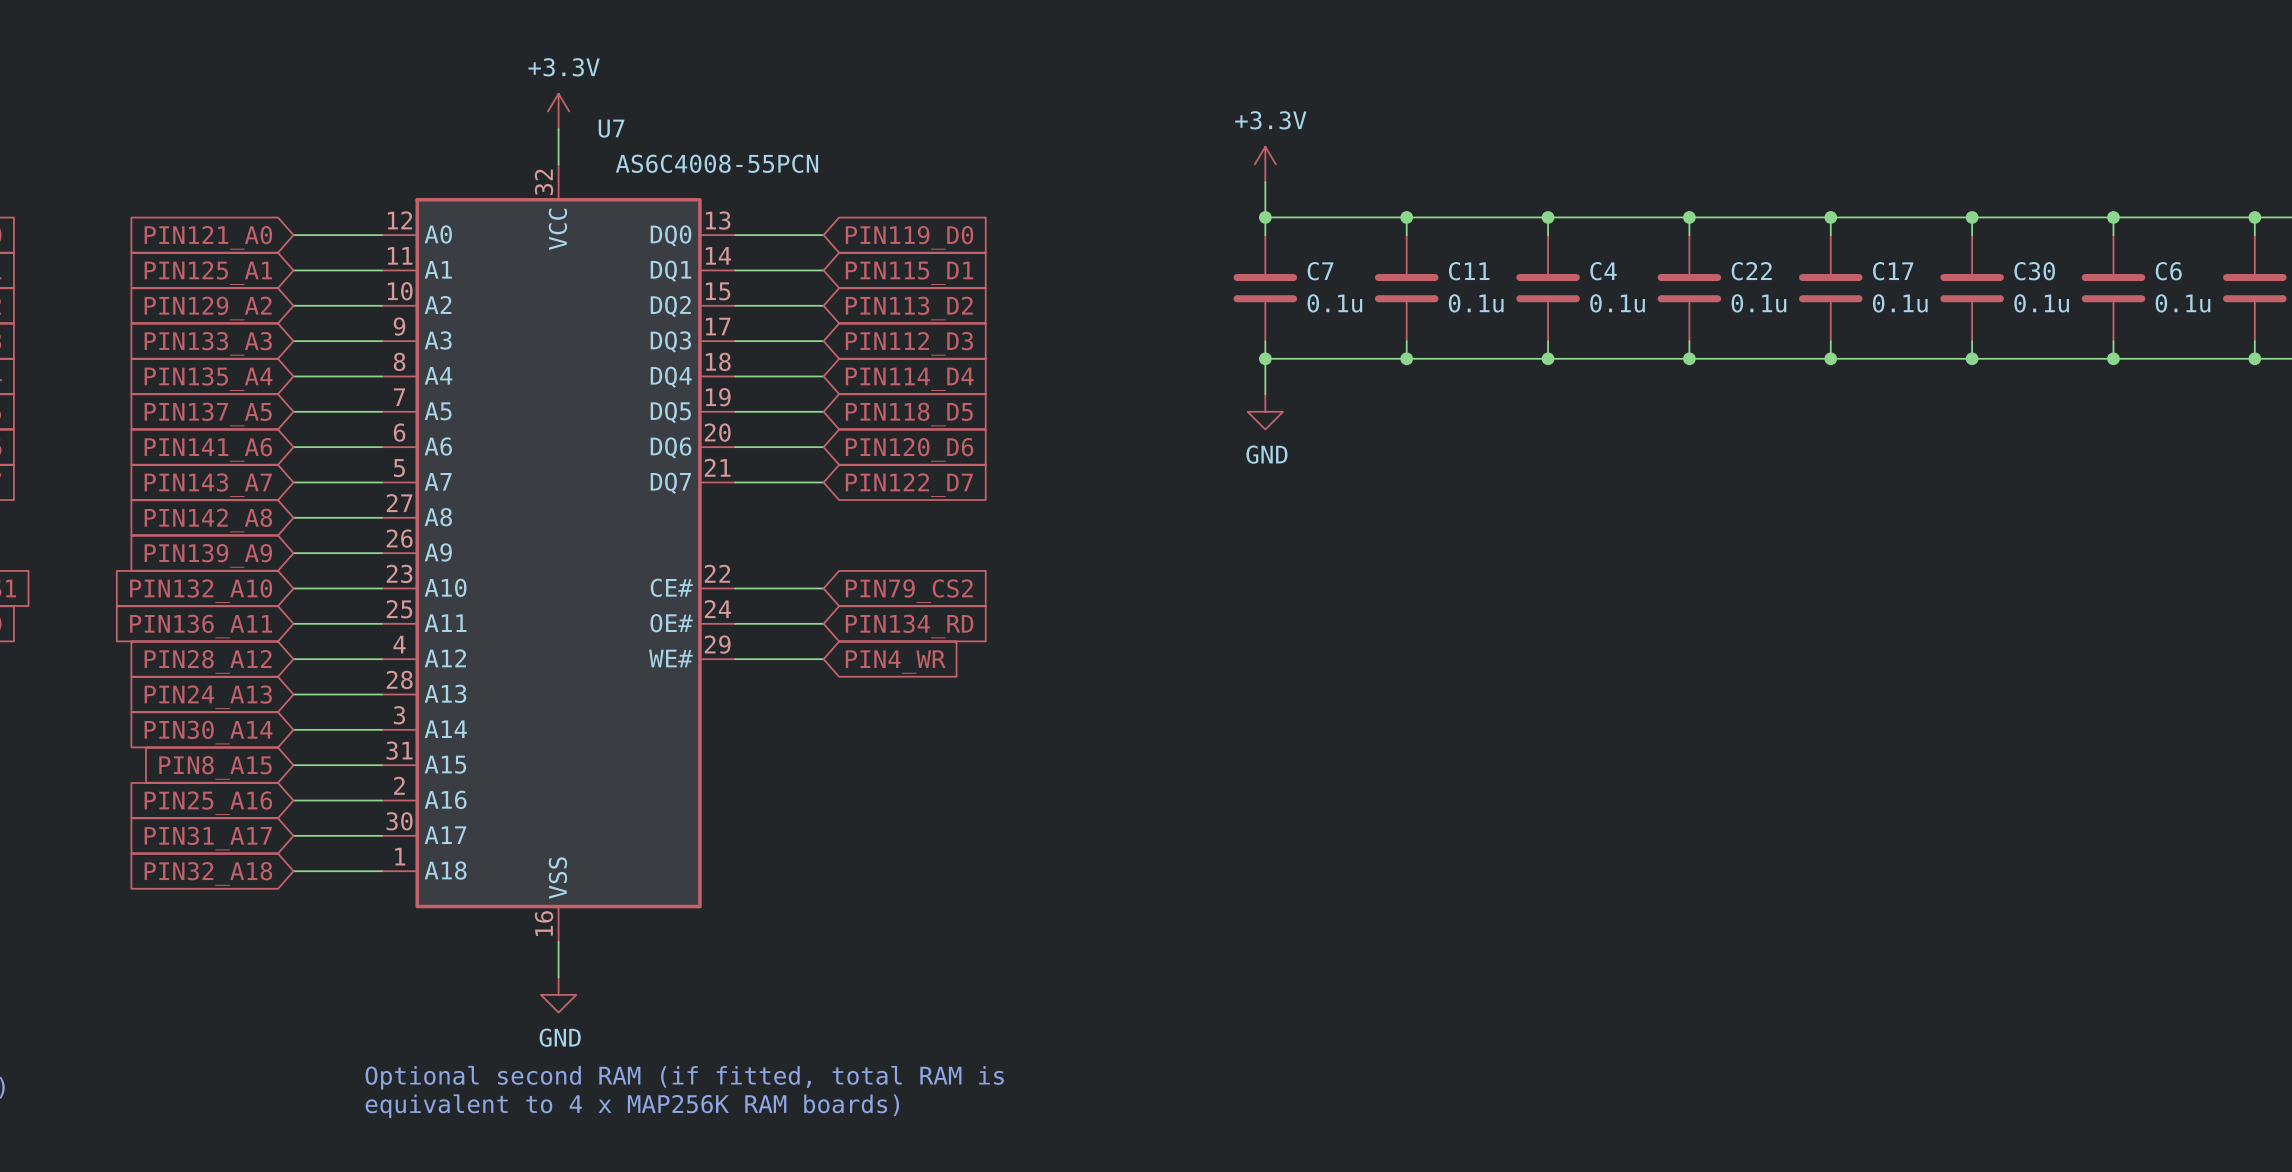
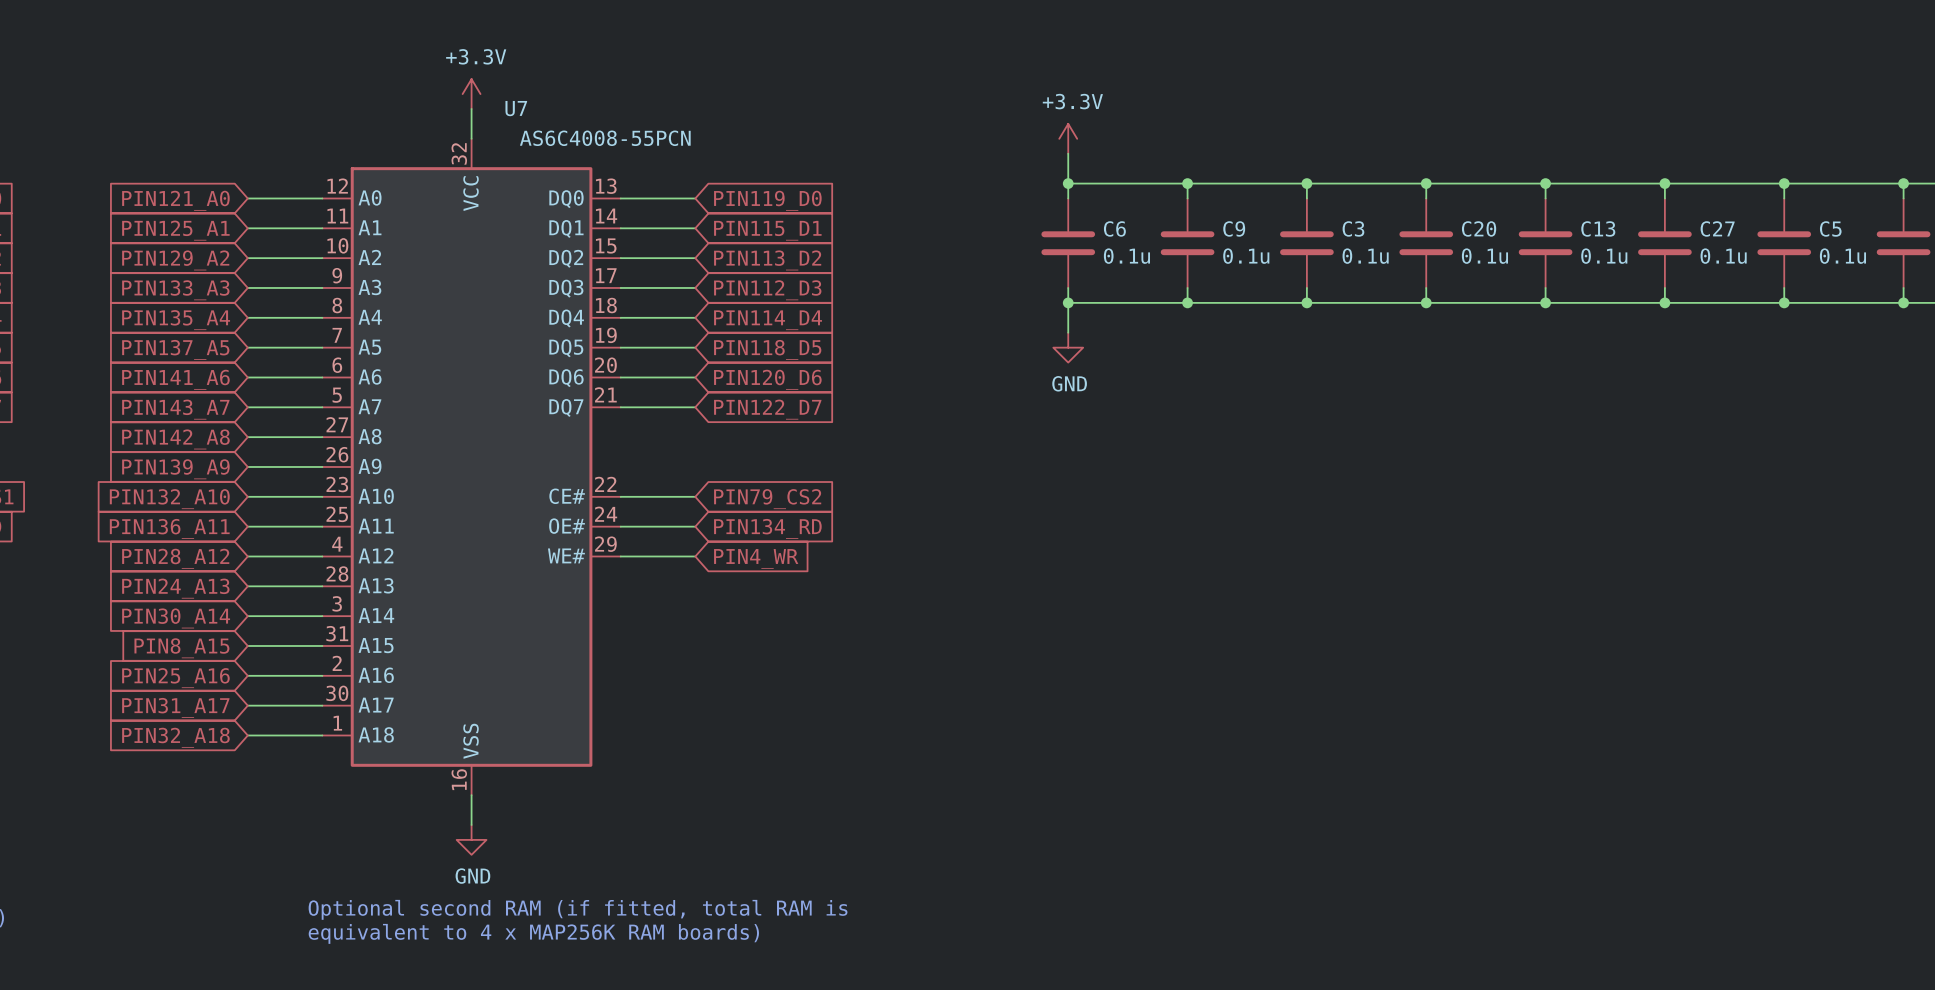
C7 name: C7 (1320, 271) -> C6 (1114, 228)
C11 name: C11 (1469, 271) -> C9 (1234, 228)
C4 name: C4 (1603, 271) -> C3 (1353, 228)
C22 name: C22 (1751, 271) -> C20 (1479, 228)
C17 name: C17 (1893, 271) -> C13 (1598, 228)
C30 name: C30 (2034, 271) -> C27 (1717, 228)
C6 name: C6 (2168, 271) -> C5 (1830, 228)

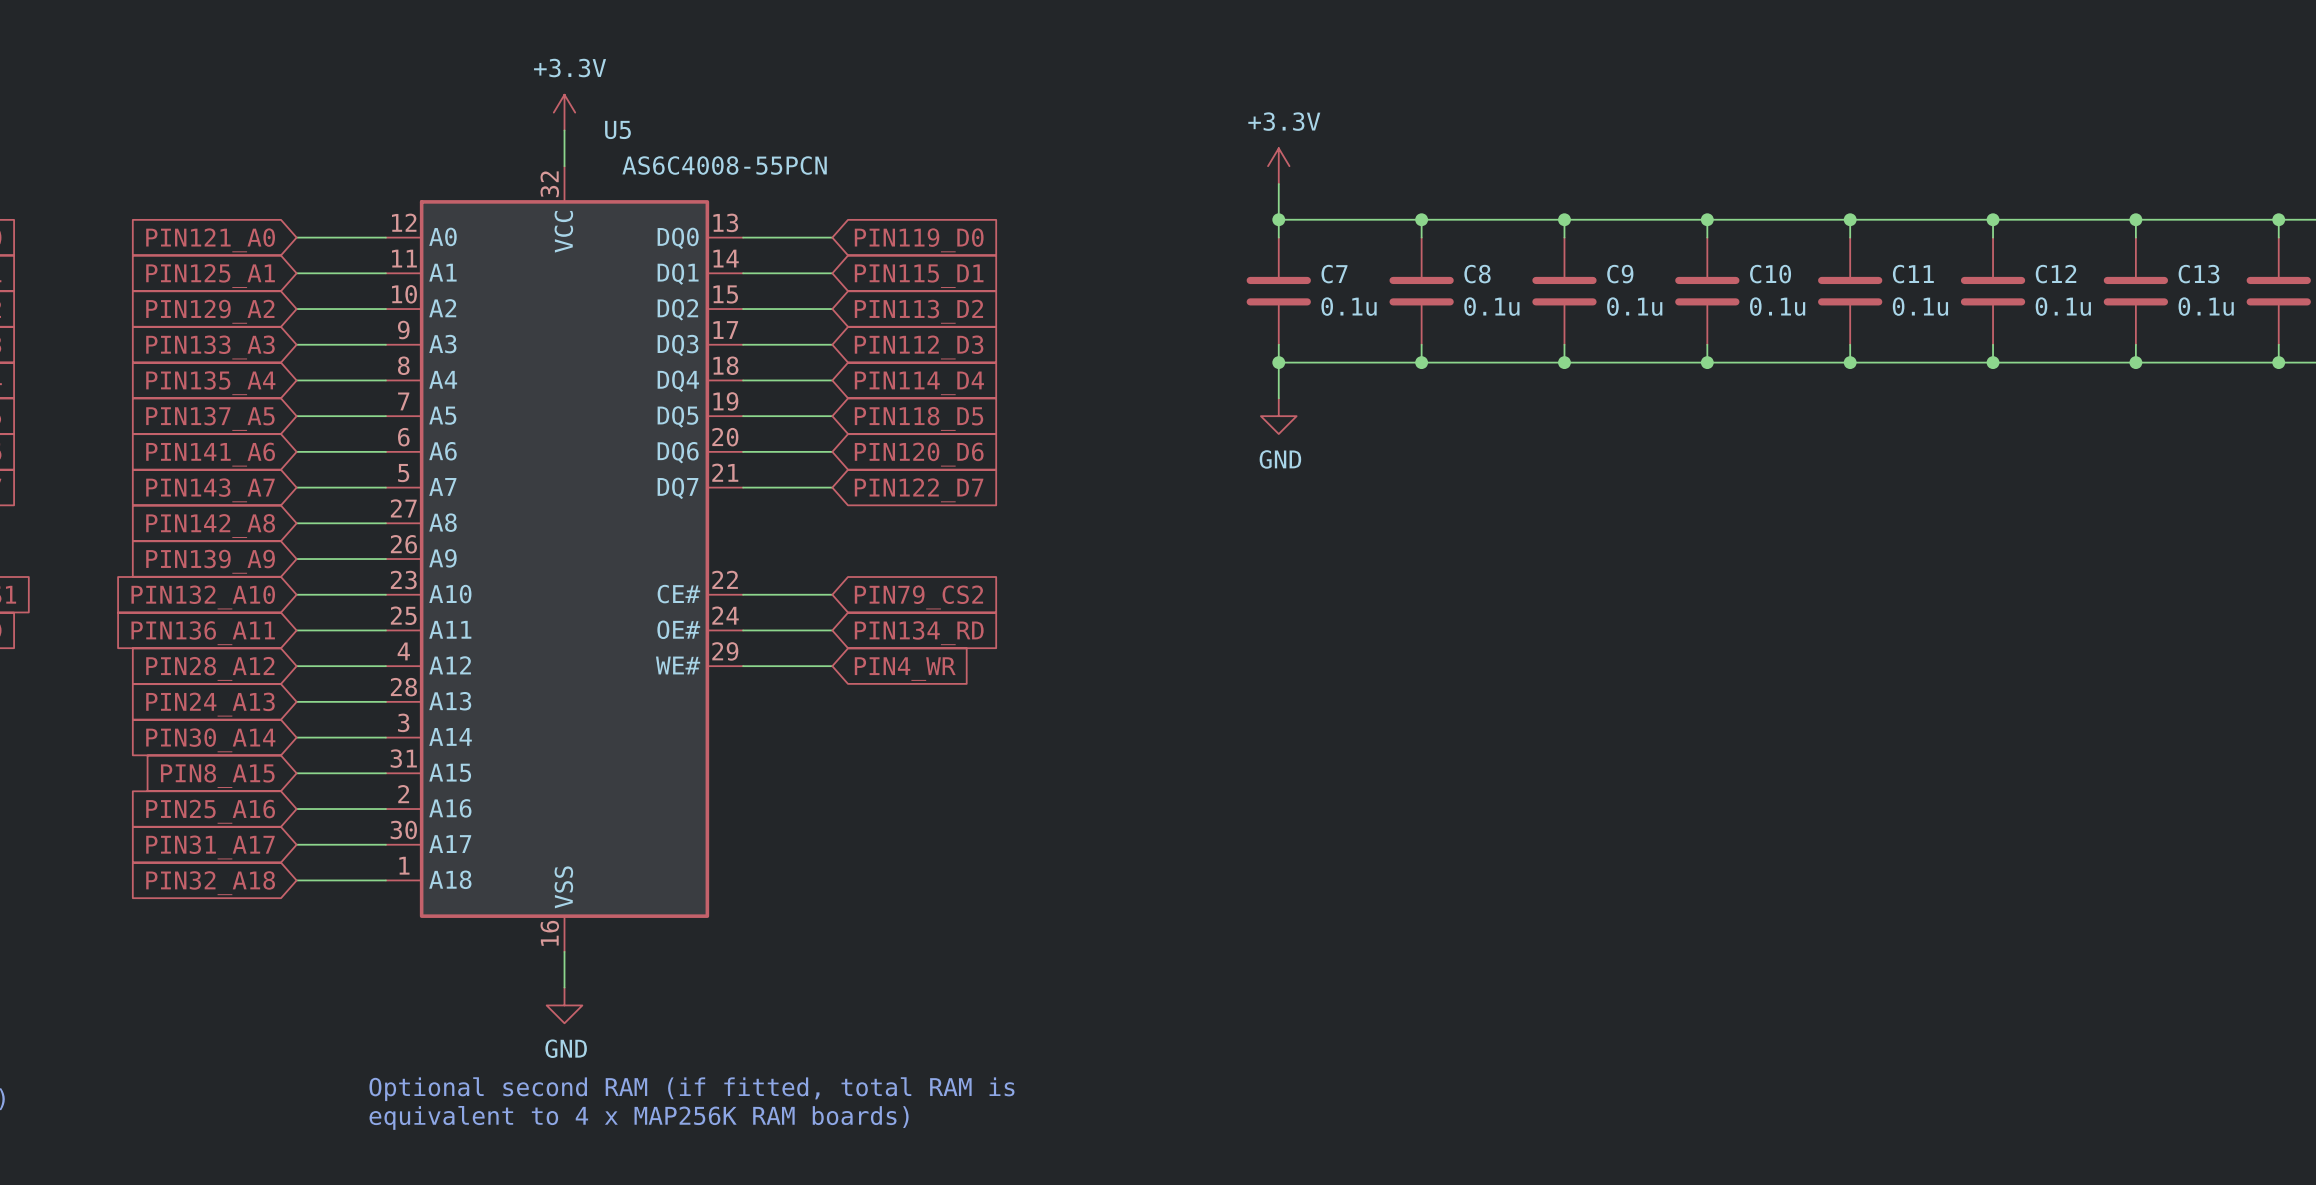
U7 name: U7 (516, 108) -> U5 (617, 129)
C6 name: C6 (1114, 228) -> C7 (1334, 274)
C9 name: C9 (1234, 228) -> C8 (1477, 274)
C3 name: C3 (1353, 228) -> C9 (1620, 274)
C20 name: C20 (1479, 228) -> C10 (1770, 274)
C13 name: C13 (1598, 228) -> C11 (1913, 274)
C27 name: C27 (1717, 228) -> C12 (2056, 274)
C5 name: C5 (1830, 228) -> C13 (2198, 274)

